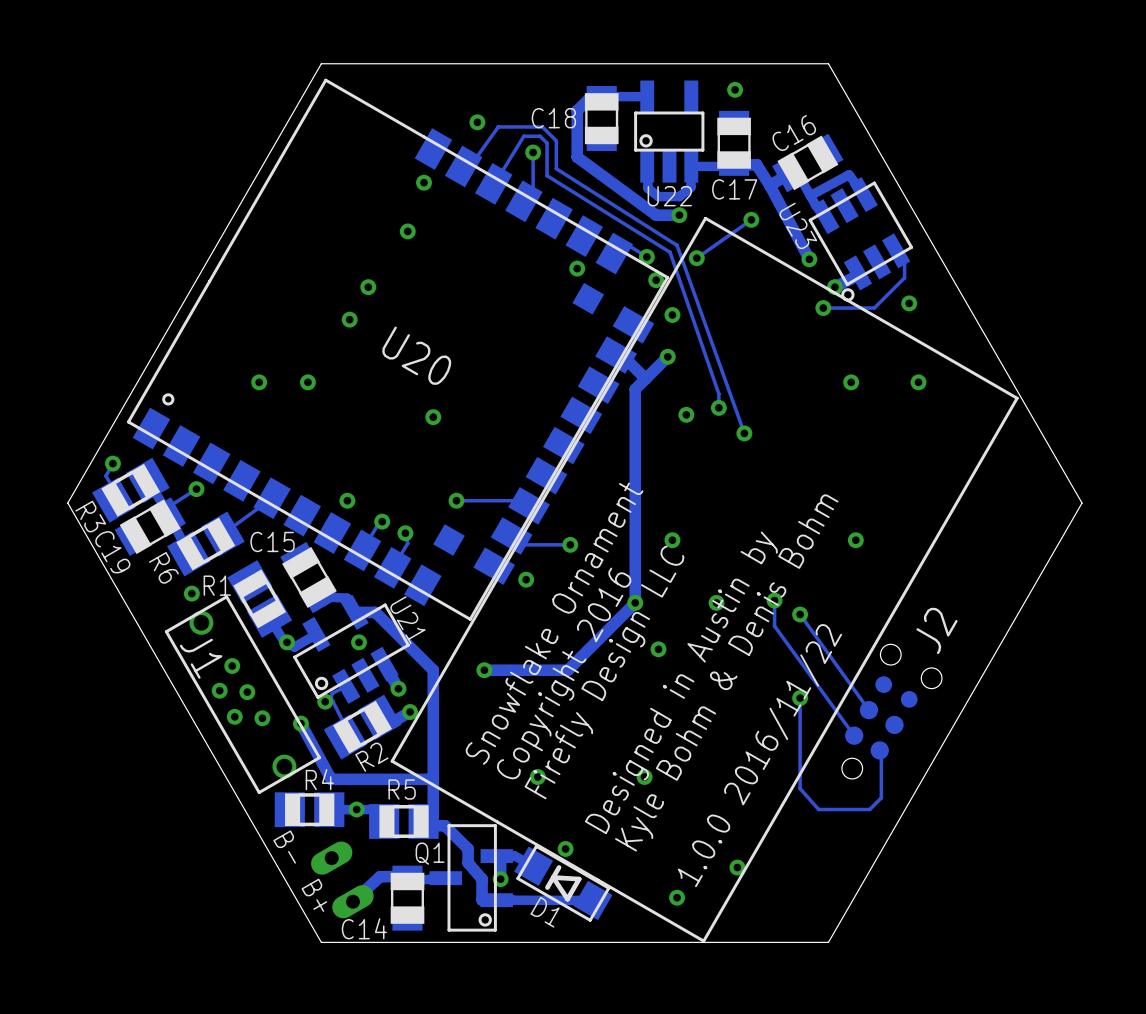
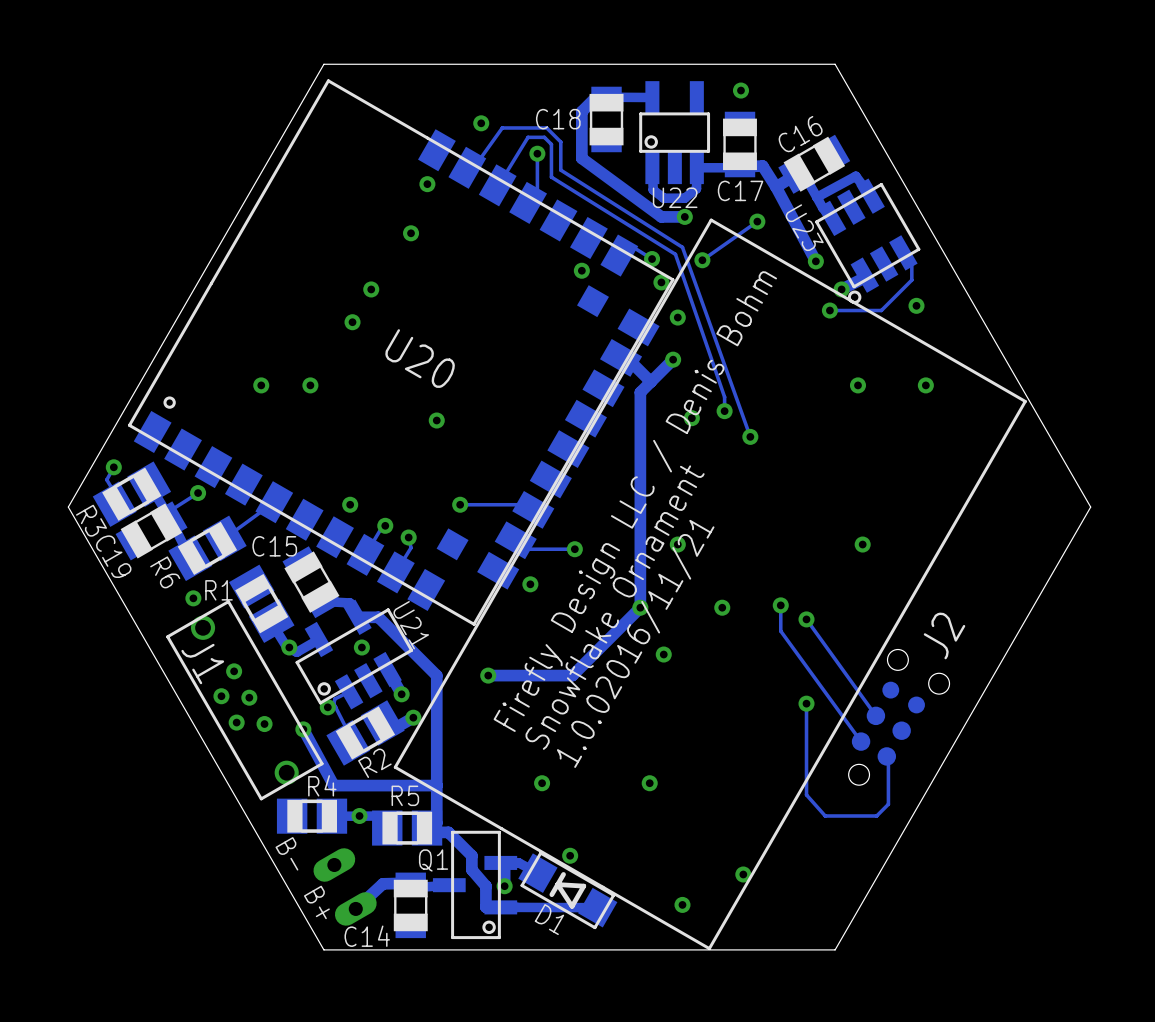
text position: Snowflake Ornament (554, 623) -> Snowflake Ornament (615, 607)
text: Firefly Design LLC (604, 672) -> Firefly Design LLC / Denis Bohm (635, 501)
text: Kyle Bohm & Denis Bohm (726, 672) -> none
text: Copyright 2016 (564, 673) -> none
text: Designed in Austin by (681, 682) -> none
text: 1.0.0 2016/11/22 (759, 755) -> 1.0.02016/11/21 (635, 643)

